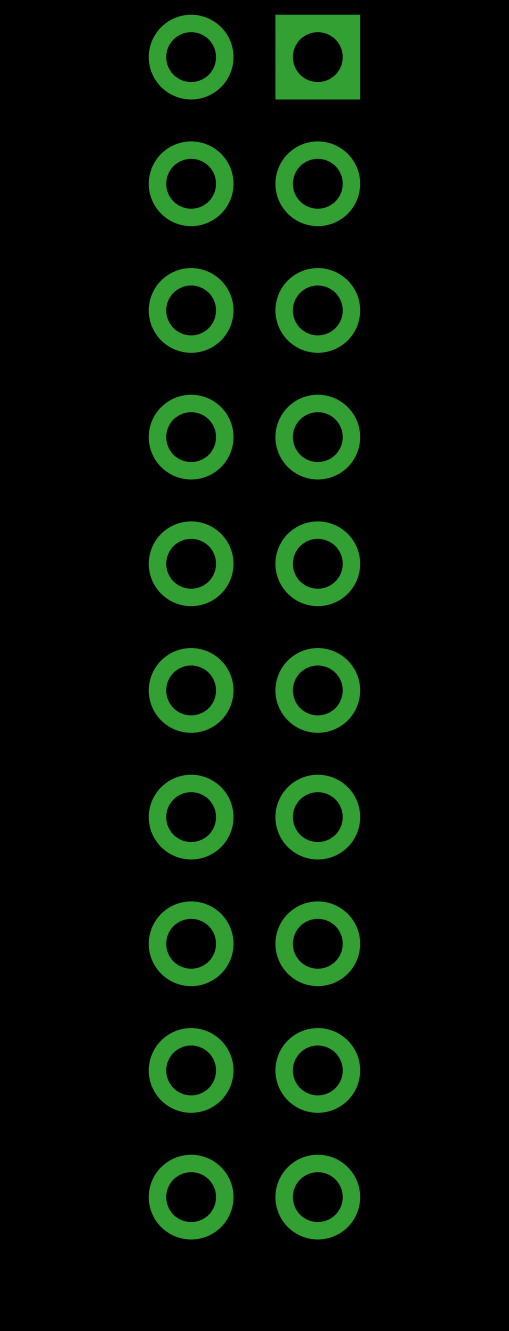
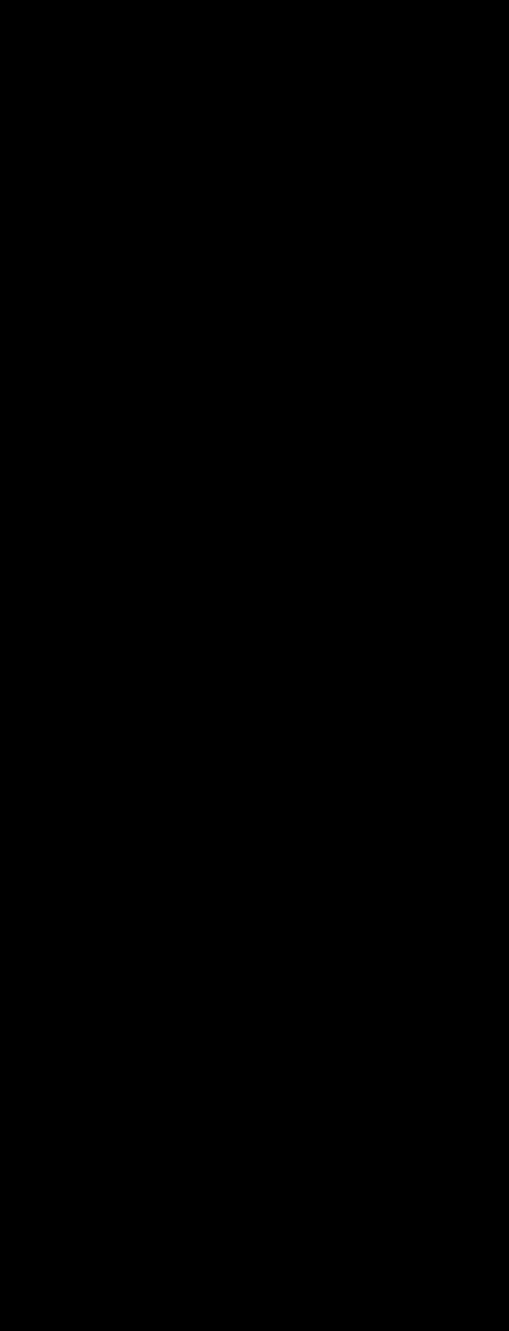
part: (254, 627) -> none

